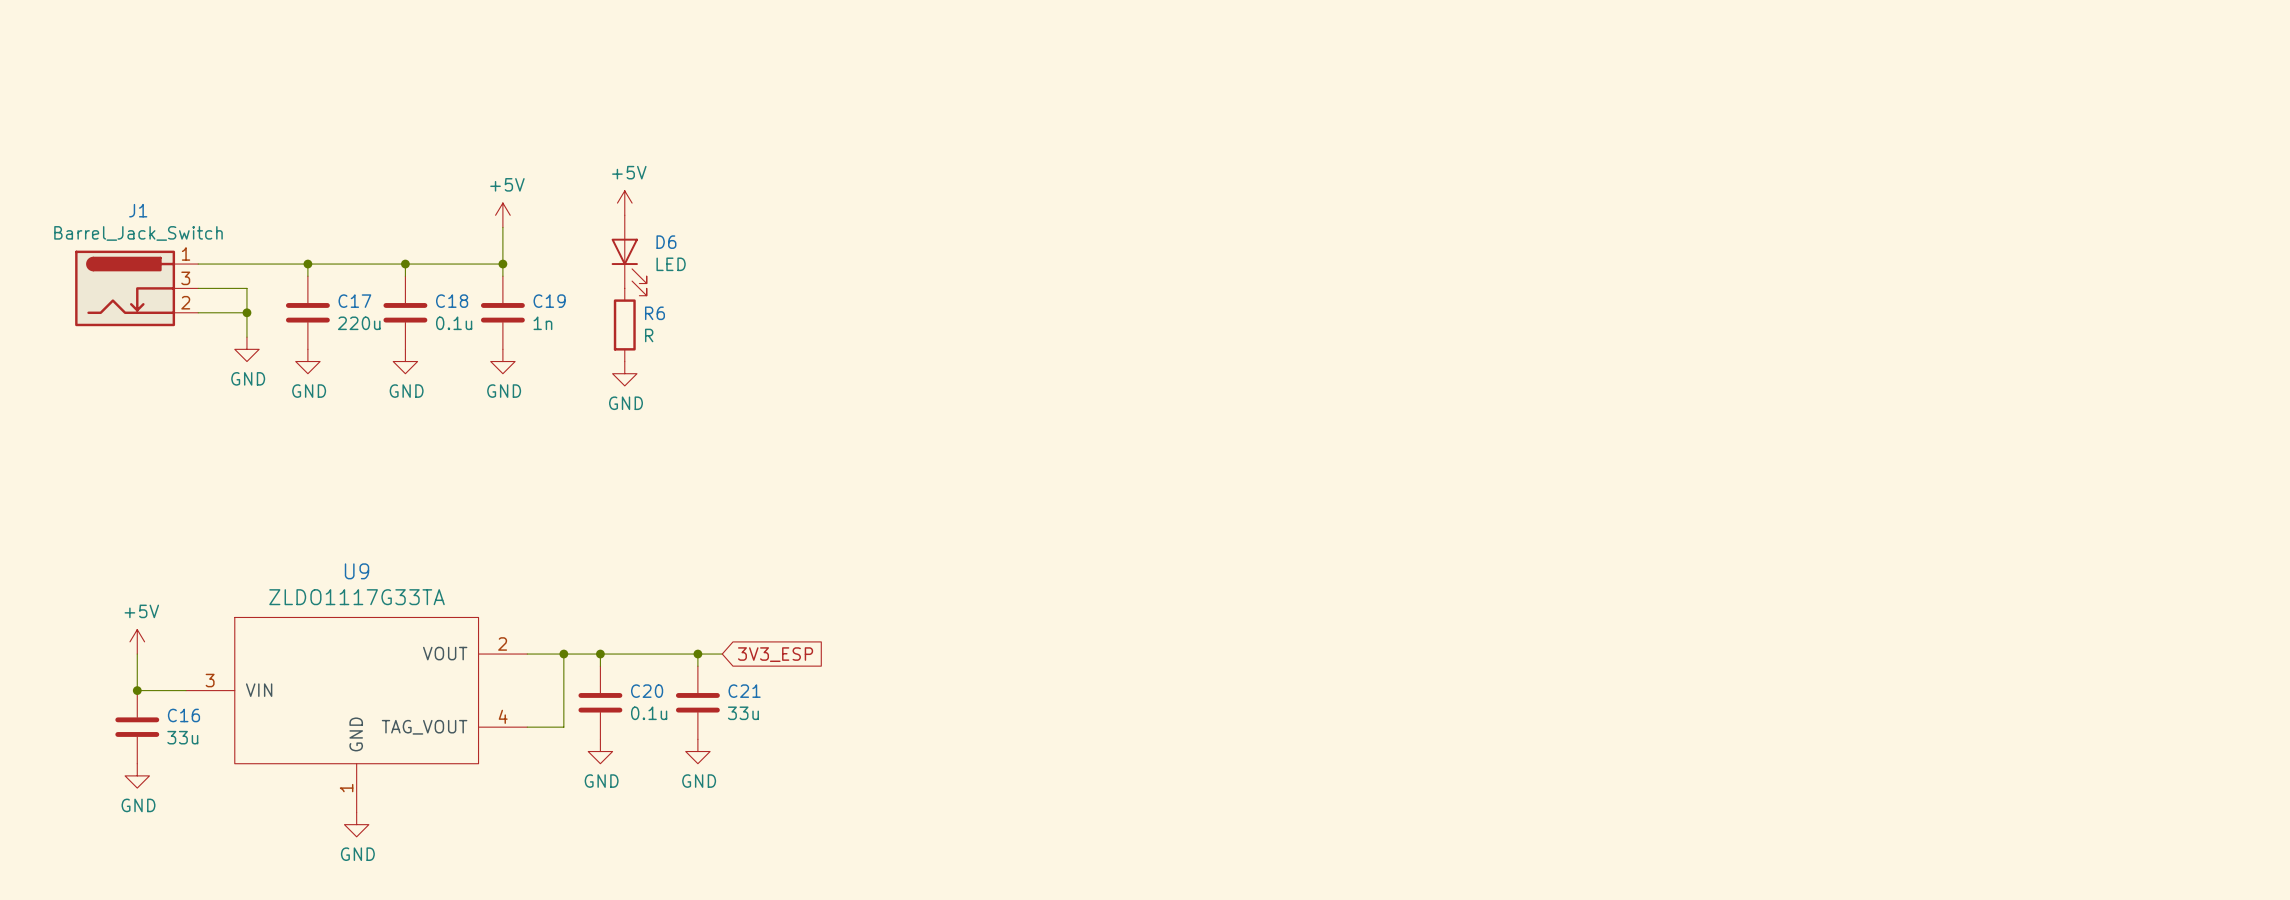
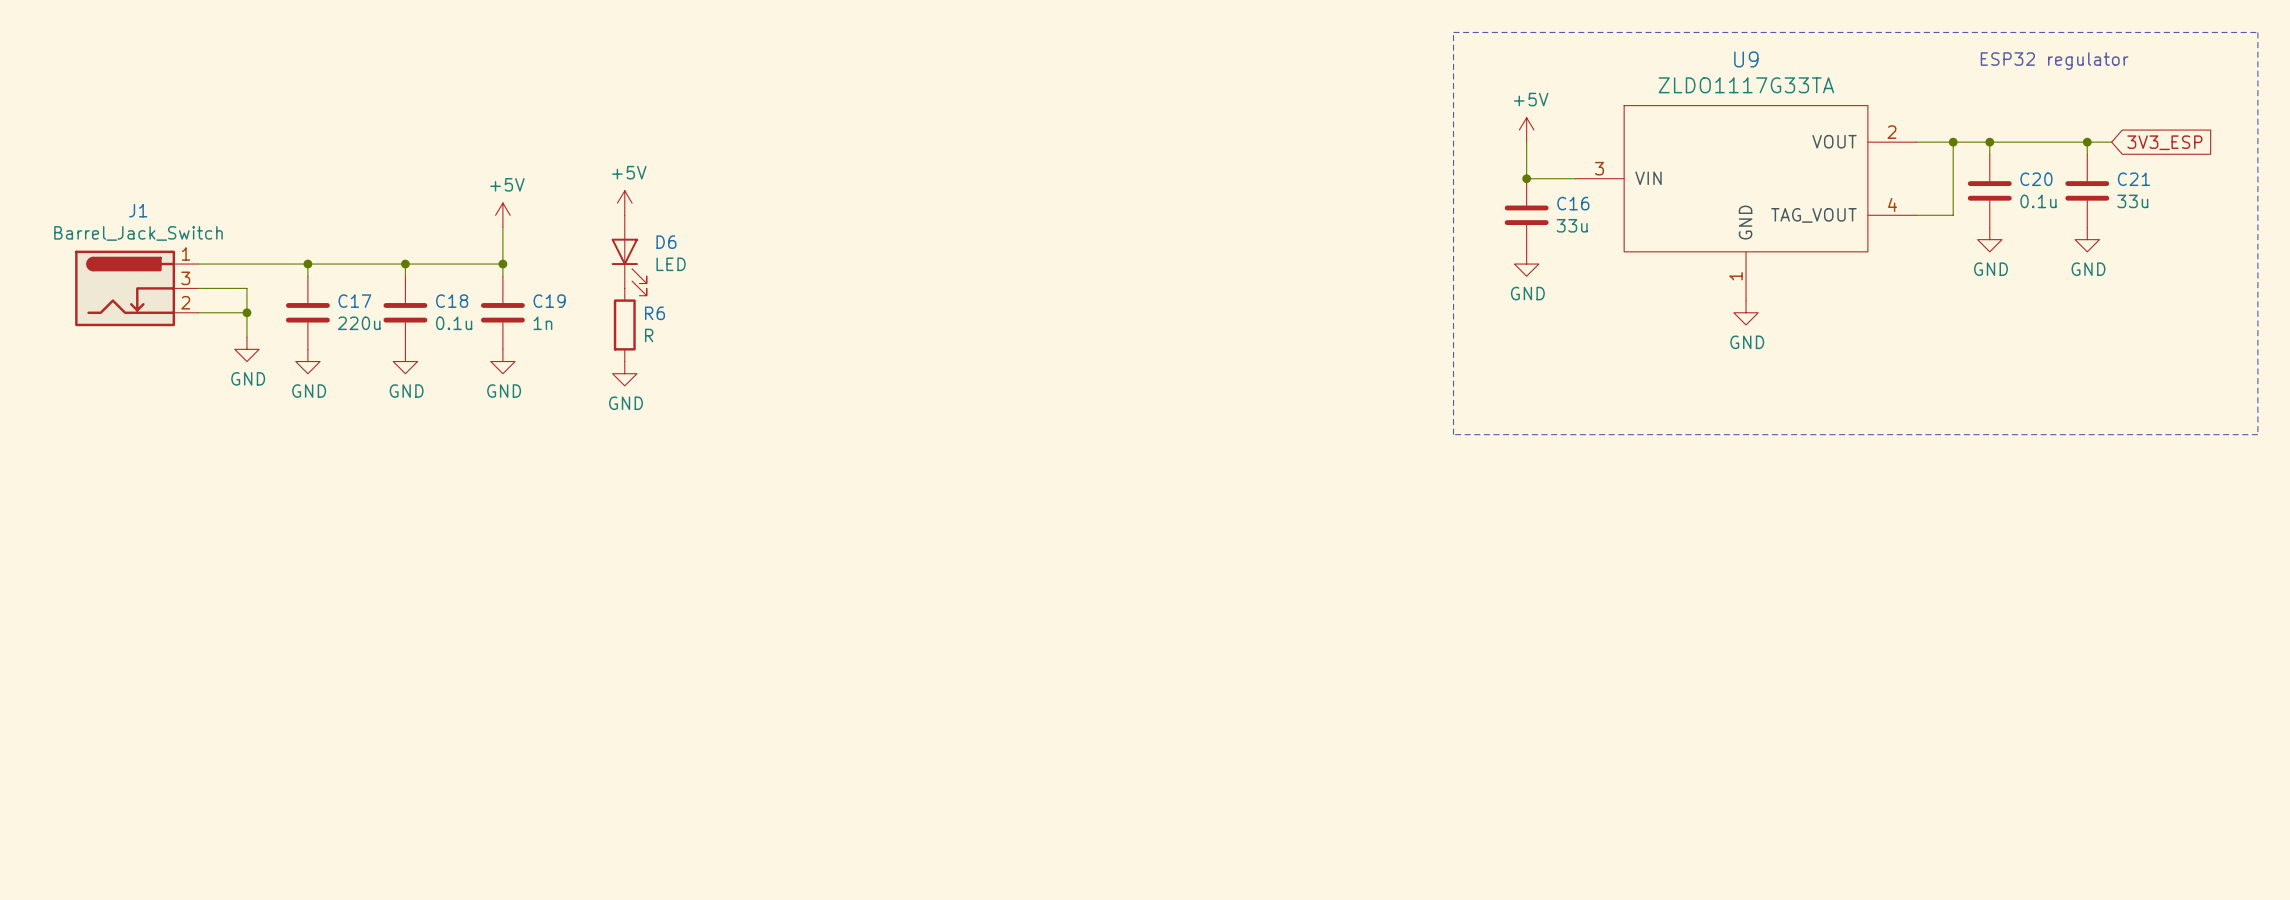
line: none -> (1453, 32) (2257, 32) (2257, 434) (1453, 434) (1453, 32)
text: none -> ESP32 regulator (2054, 61)
power symbol: none -> +5V (1526, 129)
wire: none -> (1526, 142) (1526, 178) (1575, 178)
wire: none -> (1916, 142) (2111, 142)
wire: none -> (1953, 142) (1953, 215) (1916, 215)
junction: none -> (1953, 142)
wire: none -> (1989, 142) (1989, 154)
junction: none -> (1989, 142)
wire: none -> (2087, 142) (2087, 154)
junction: none -> (2087, 142)
global label: none -> 3V3_ESP (2164, 142)
junction: none -> (1526, 178)
power symbol: none -> GND (1989, 239)
power symbol: none -> GND (2087, 239)
power symbol: none -> GND (1526, 264)
power symbol: none -> GND (1746, 312)
power symbol: +5V (137, 641) -> none
wire: (137, 654) (137, 690) (186, 690) -> none
wire: (527, 654) (722, 654) -> none
wire: (563, 654) (563, 727) (527, 727) -> none
junction: (563, 654) -> none
wire: (600, 654) (600, 666) -> none
junction: (600, 654) -> none
wire: (697, 654) (697, 666) -> none
junction: (697, 654) -> none
global label: 3V3_ESP (775, 654) -> none
junction: (137, 690) -> none
C20 position: (600, 702) -> (1989, 190)
C21 position: (697, 702) -> (2087, 190)
U9 position: (356, 714) -> (1746, 203)
C16 position: (137, 727) -> (1526, 215)
power symbol: GND (600, 751) -> none
power symbol: GND (697, 751) -> none
power symbol: GND (137, 775) -> none
power symbol: GND (356, 824) -> none

